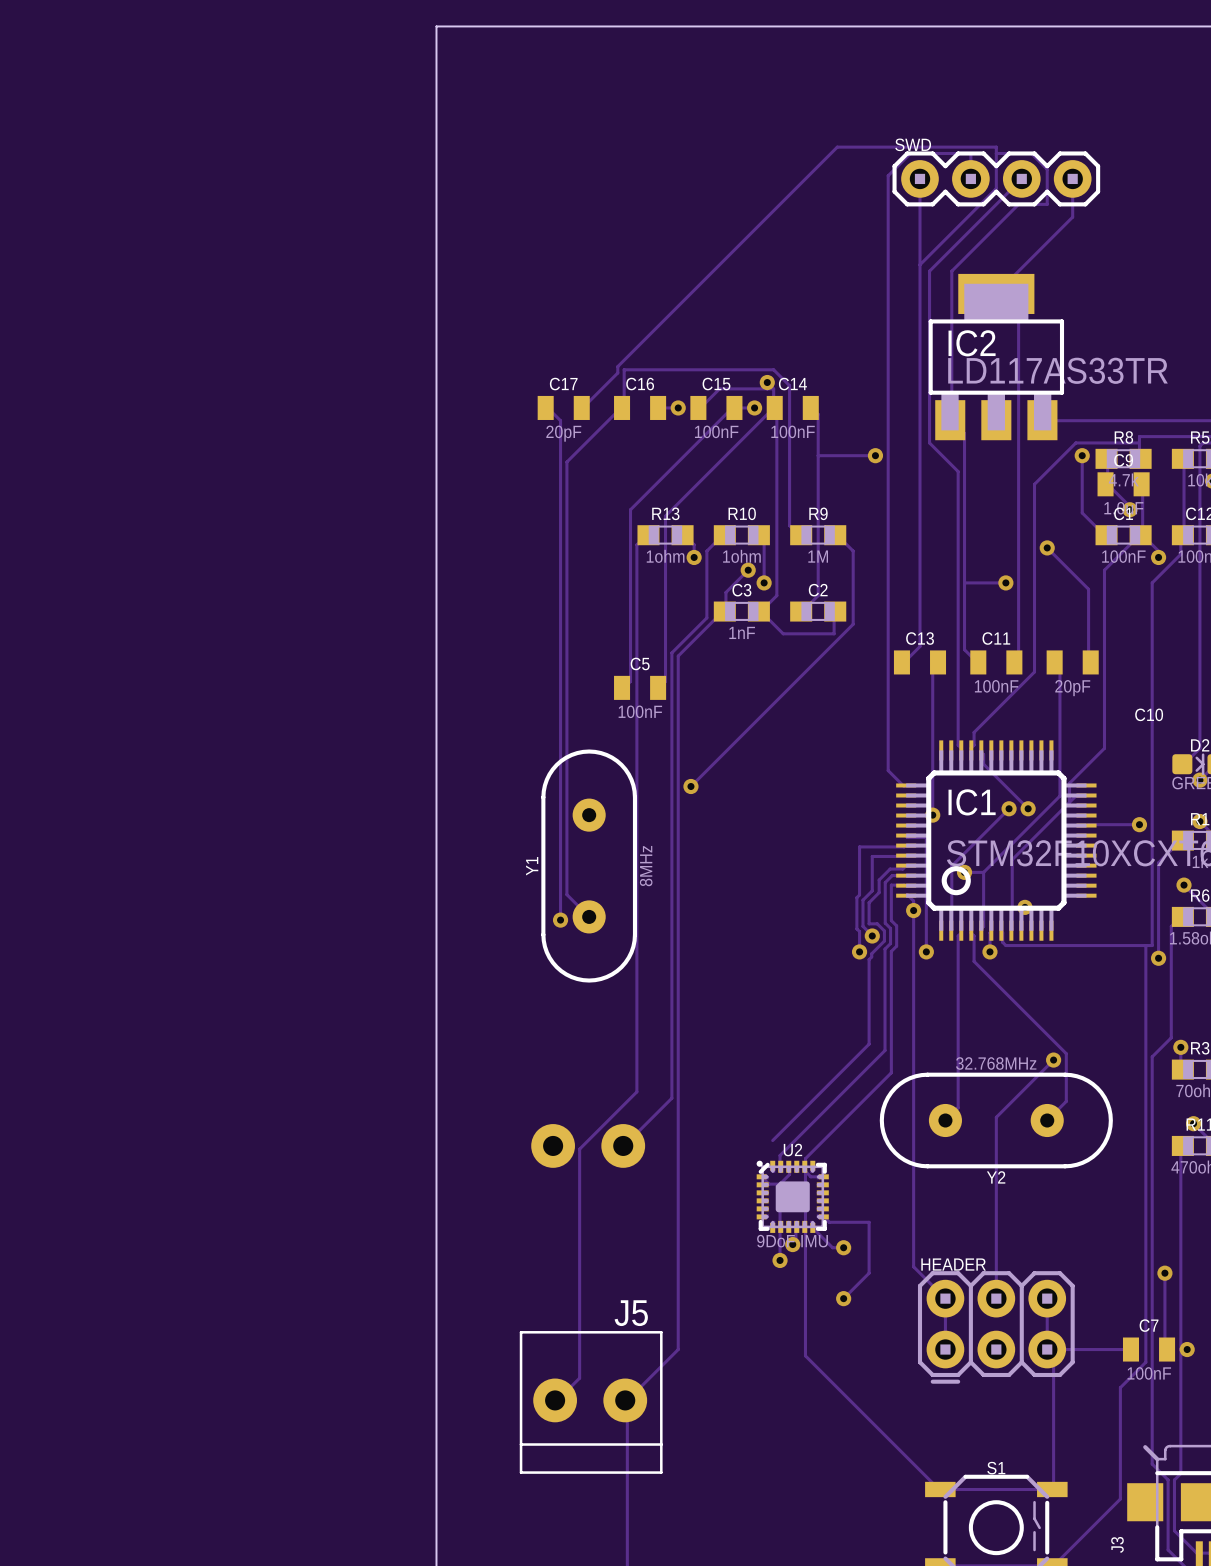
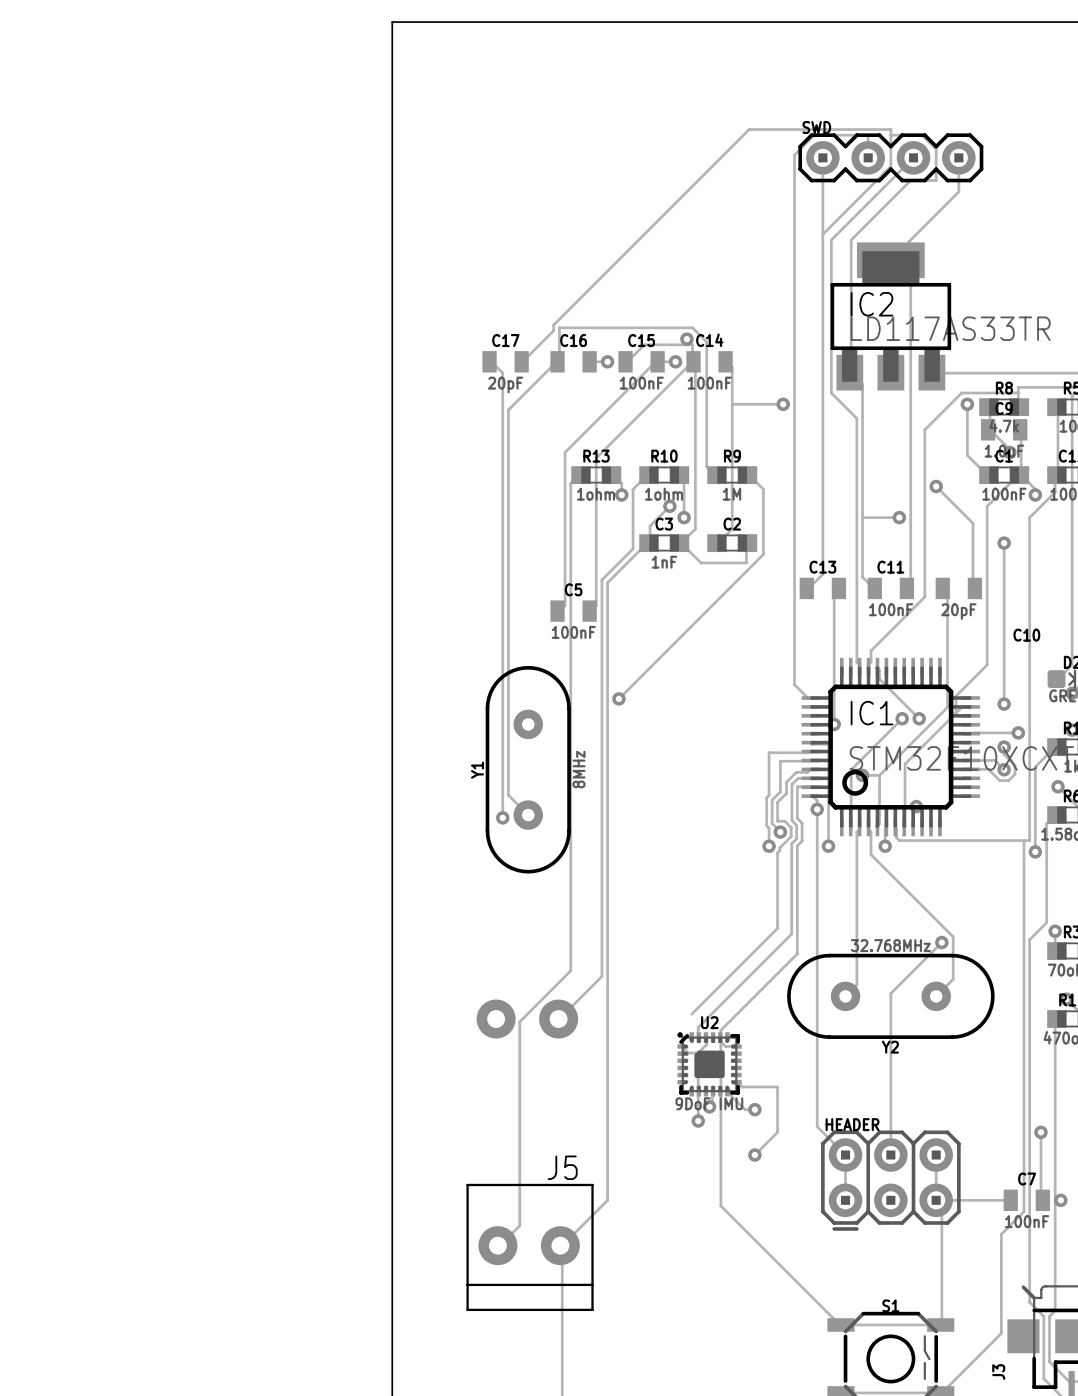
track: none -> (1004, 543) (1004, 704)
via: none -> (1004, 543)
via: none -> (1004, 704)
track: none -> (1004, 747) (1004, 754) (1015, 765) (1015, 774) (1008, 780) (999, 780) (988, 769) (971, 769)
via: none -> (1004, 747)
track: none -> (971, 760) (994, 760) (1004, 769)
via: none -> (1004, 769)

